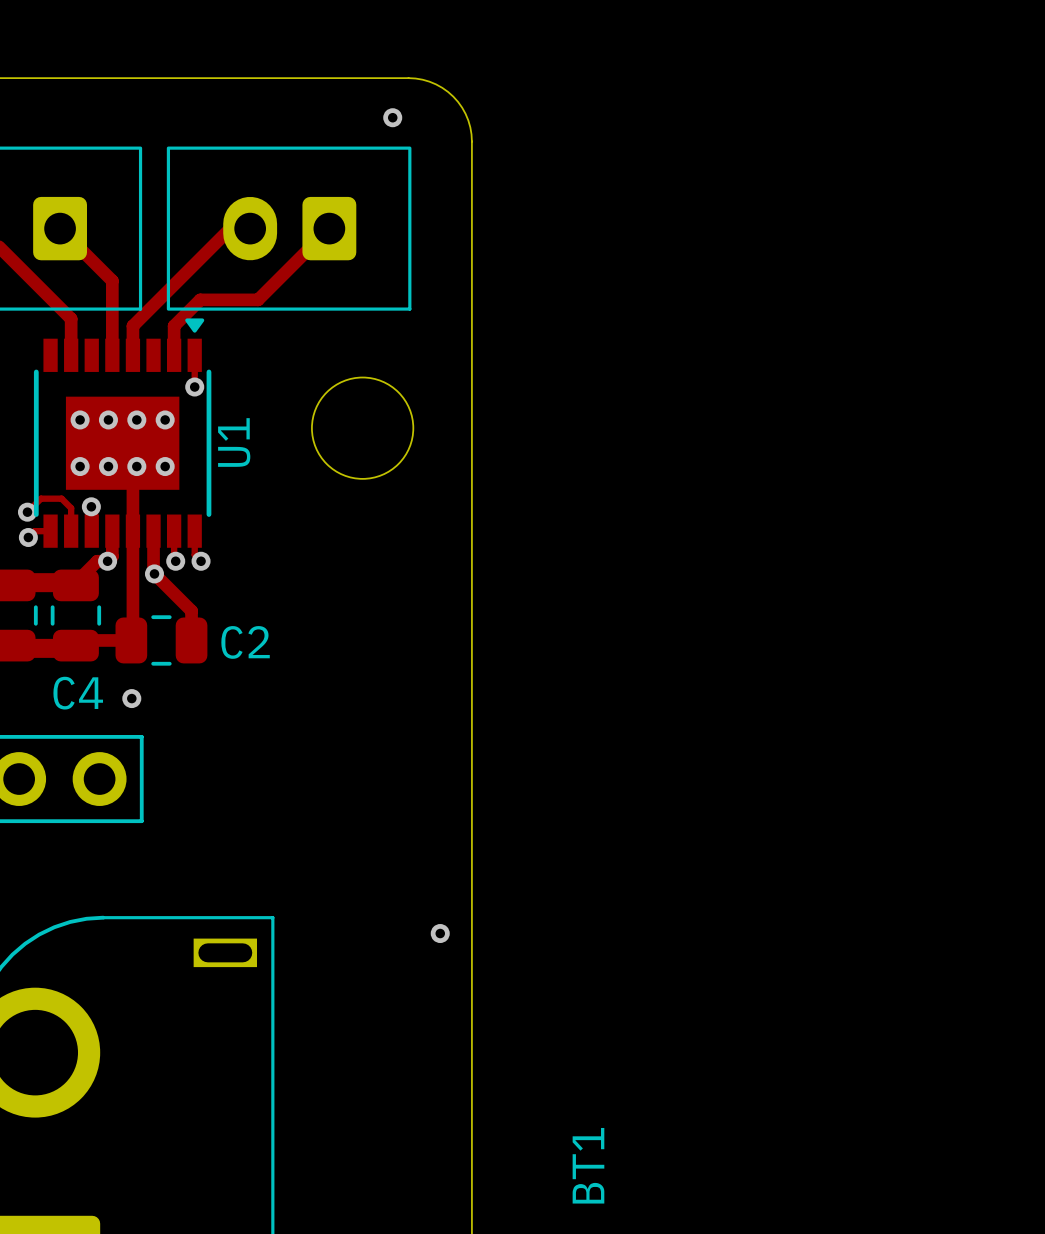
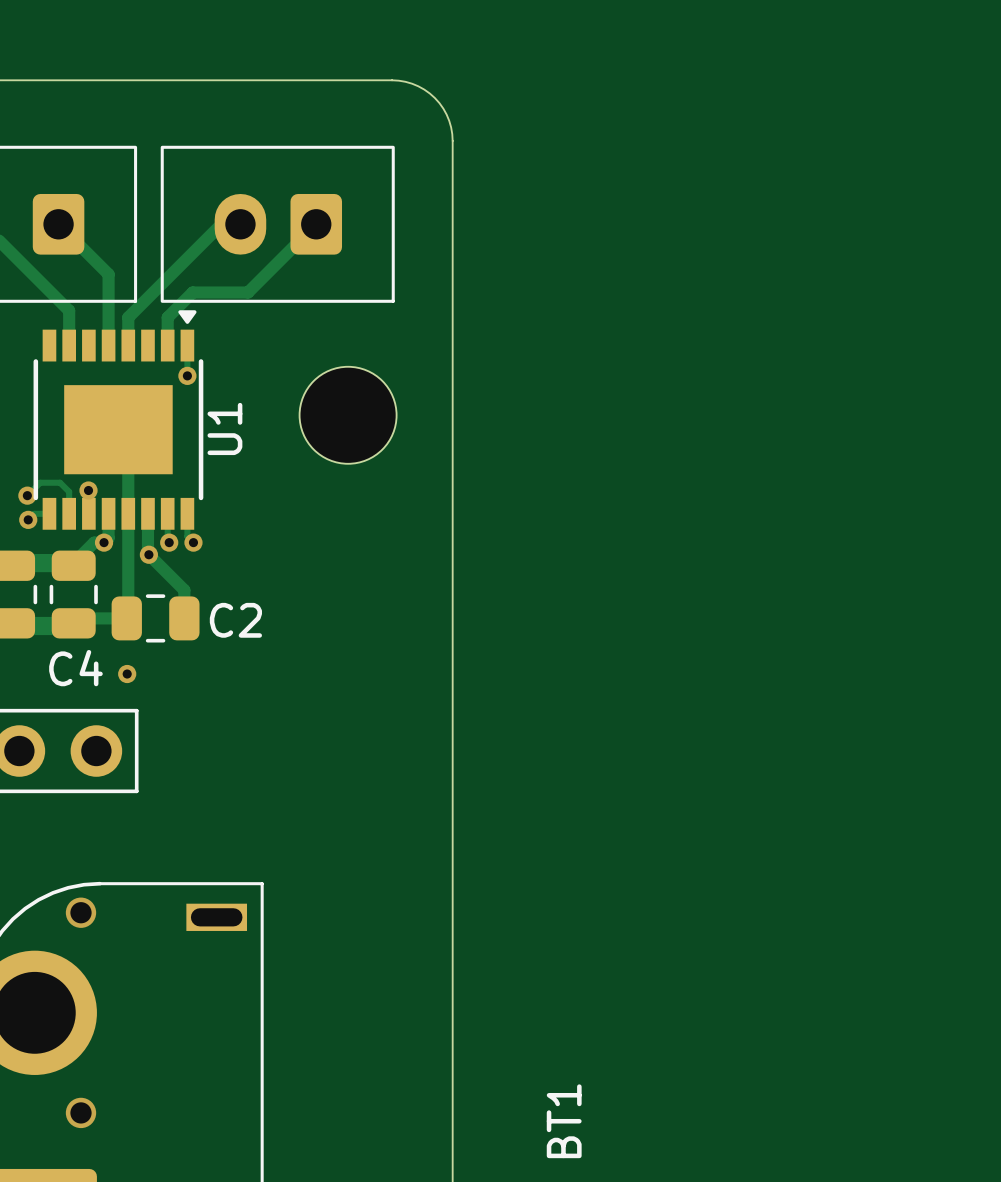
via: (392, 117) -> none
via: (80, 419) -> none
via: (108, 419) -> none
via: (136, 419) -> none
via: (165, 419) -> none
via: (80, 466) -> none
via: (108, 466) -> none
via: (136, 466) -> none
via: (165, 466) -> none
via: (440, 933) -> none
via: none -> (80, 912)
via: none -> (80, 1112)

